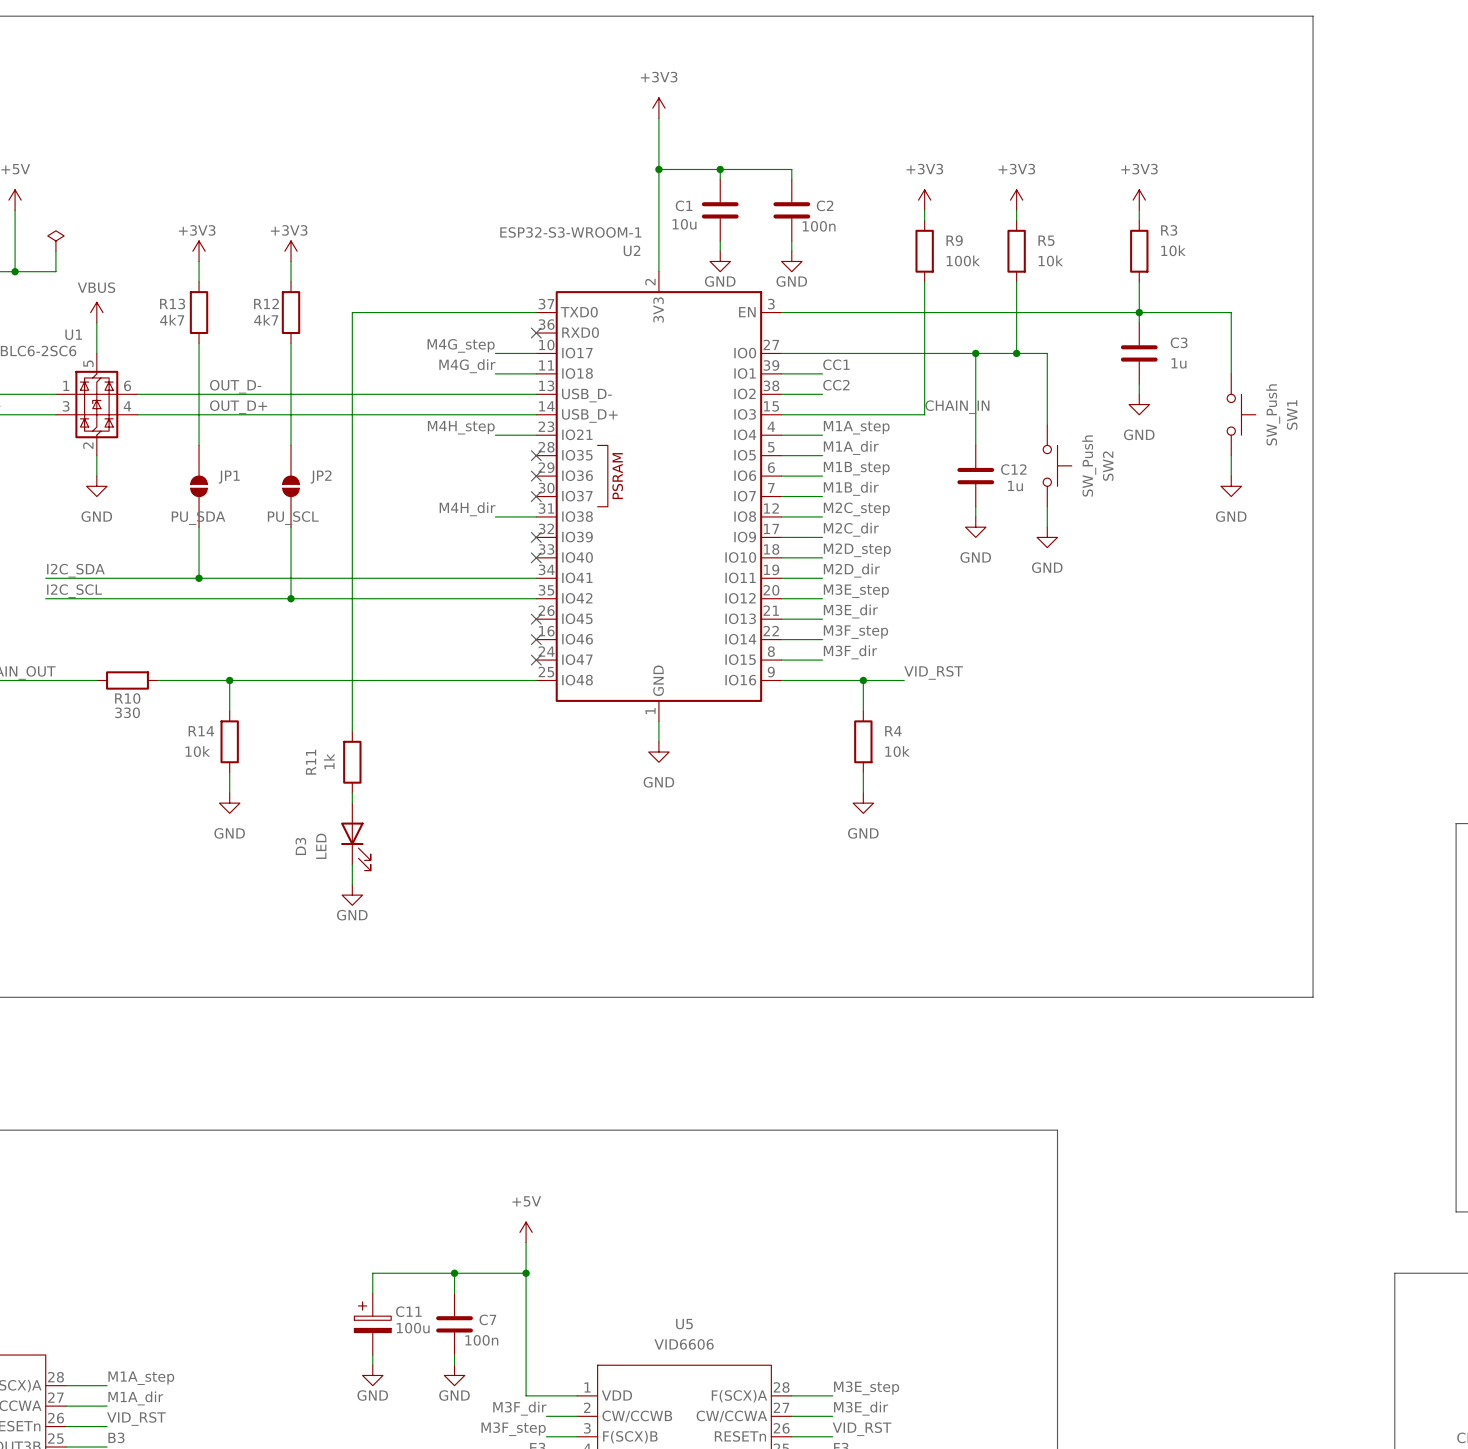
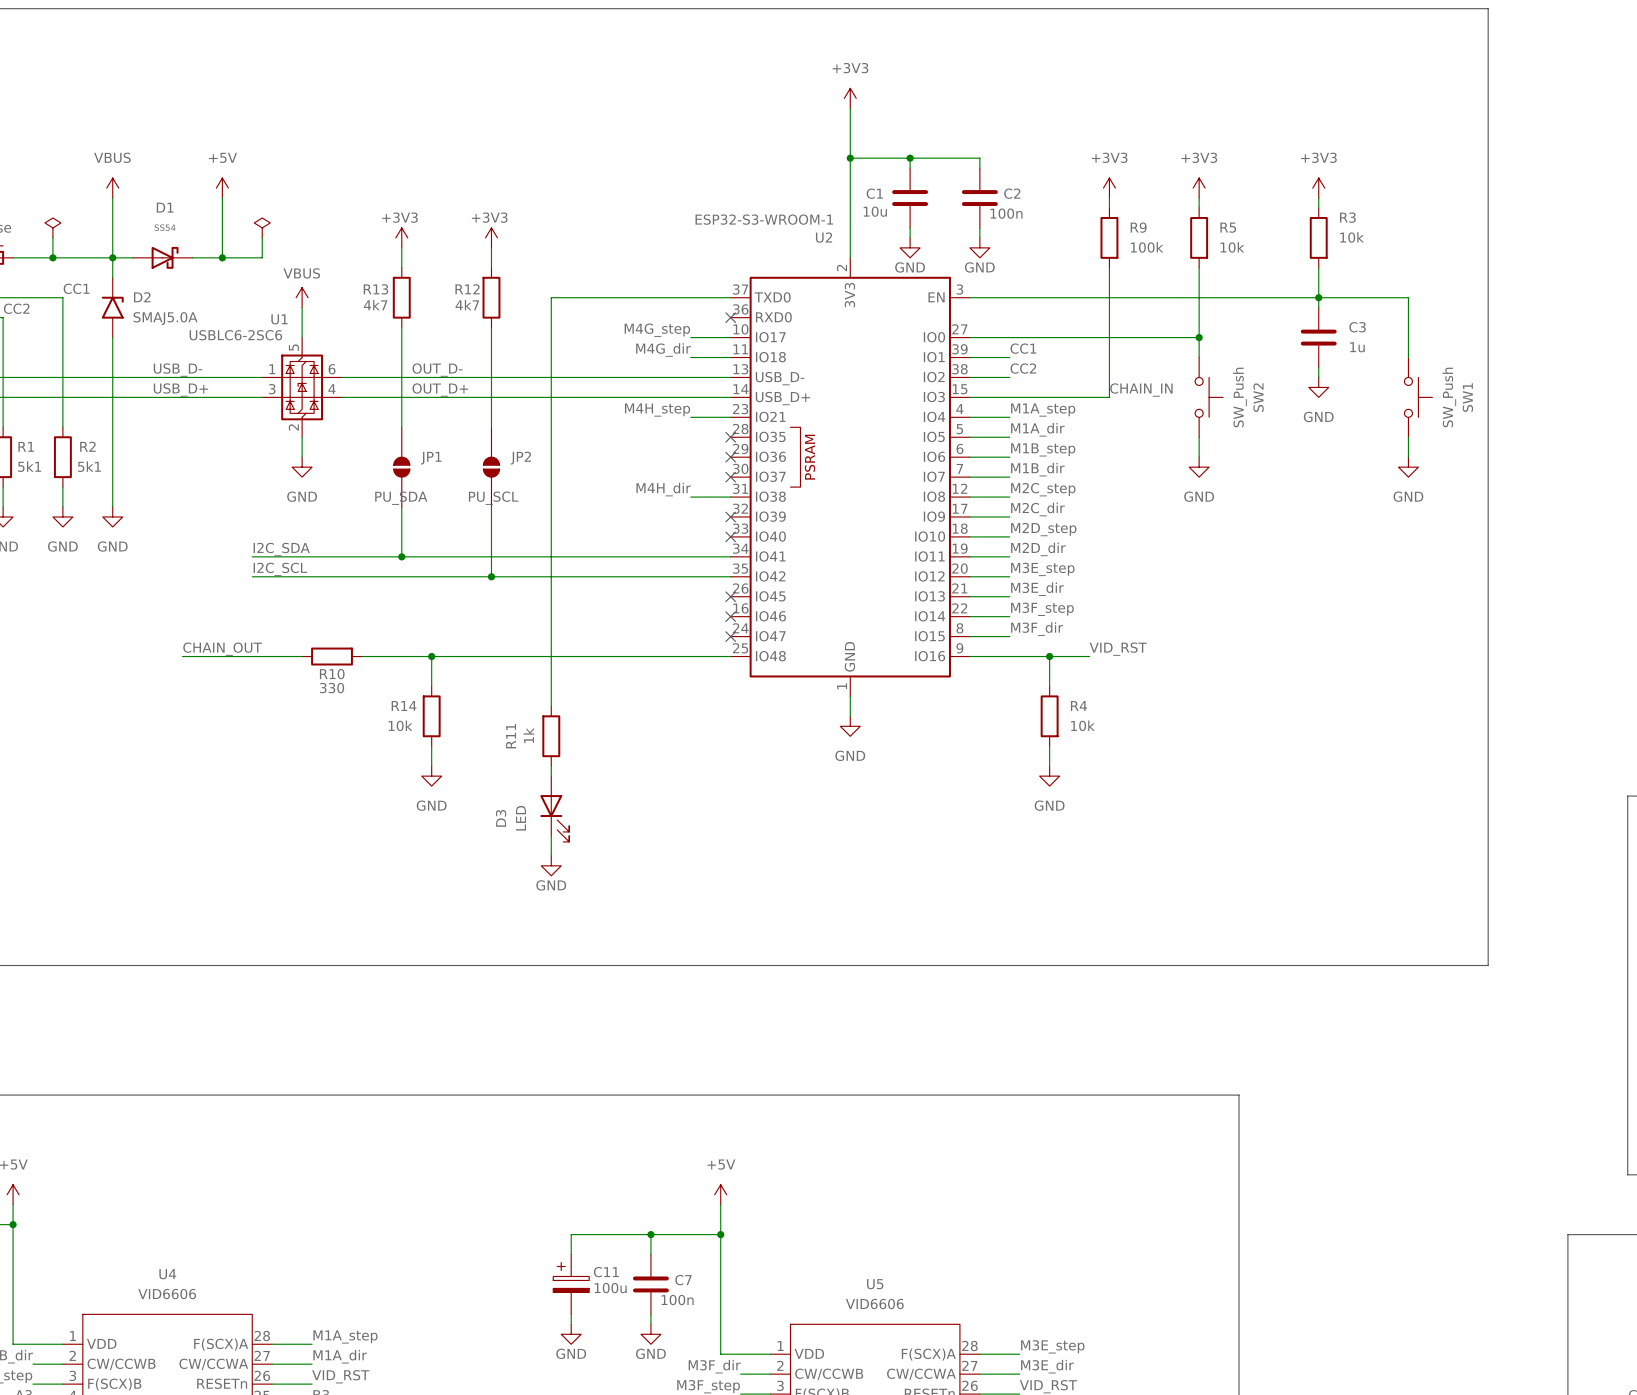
wire: (975, 353) (975, 445) -> none
junction: (975, 353) -> none
wire: (1016, 353) (1047, 353) (1047, 424) -> (1199, 337) (1199, 357)
SW2 position: (1057, 465) -> (1209, 397)
C12: 1u (975, 476) -> none
power symbol: none -> GND (1199, 467)
wire: (975, 506) (975, 516) -> none
wire: (1047, 506) (1047, 527) -> (1199, 437) (1199, 457)
power symbol: GND (975, 527) -> none
power symbol: GND (1047, 537) -> none

